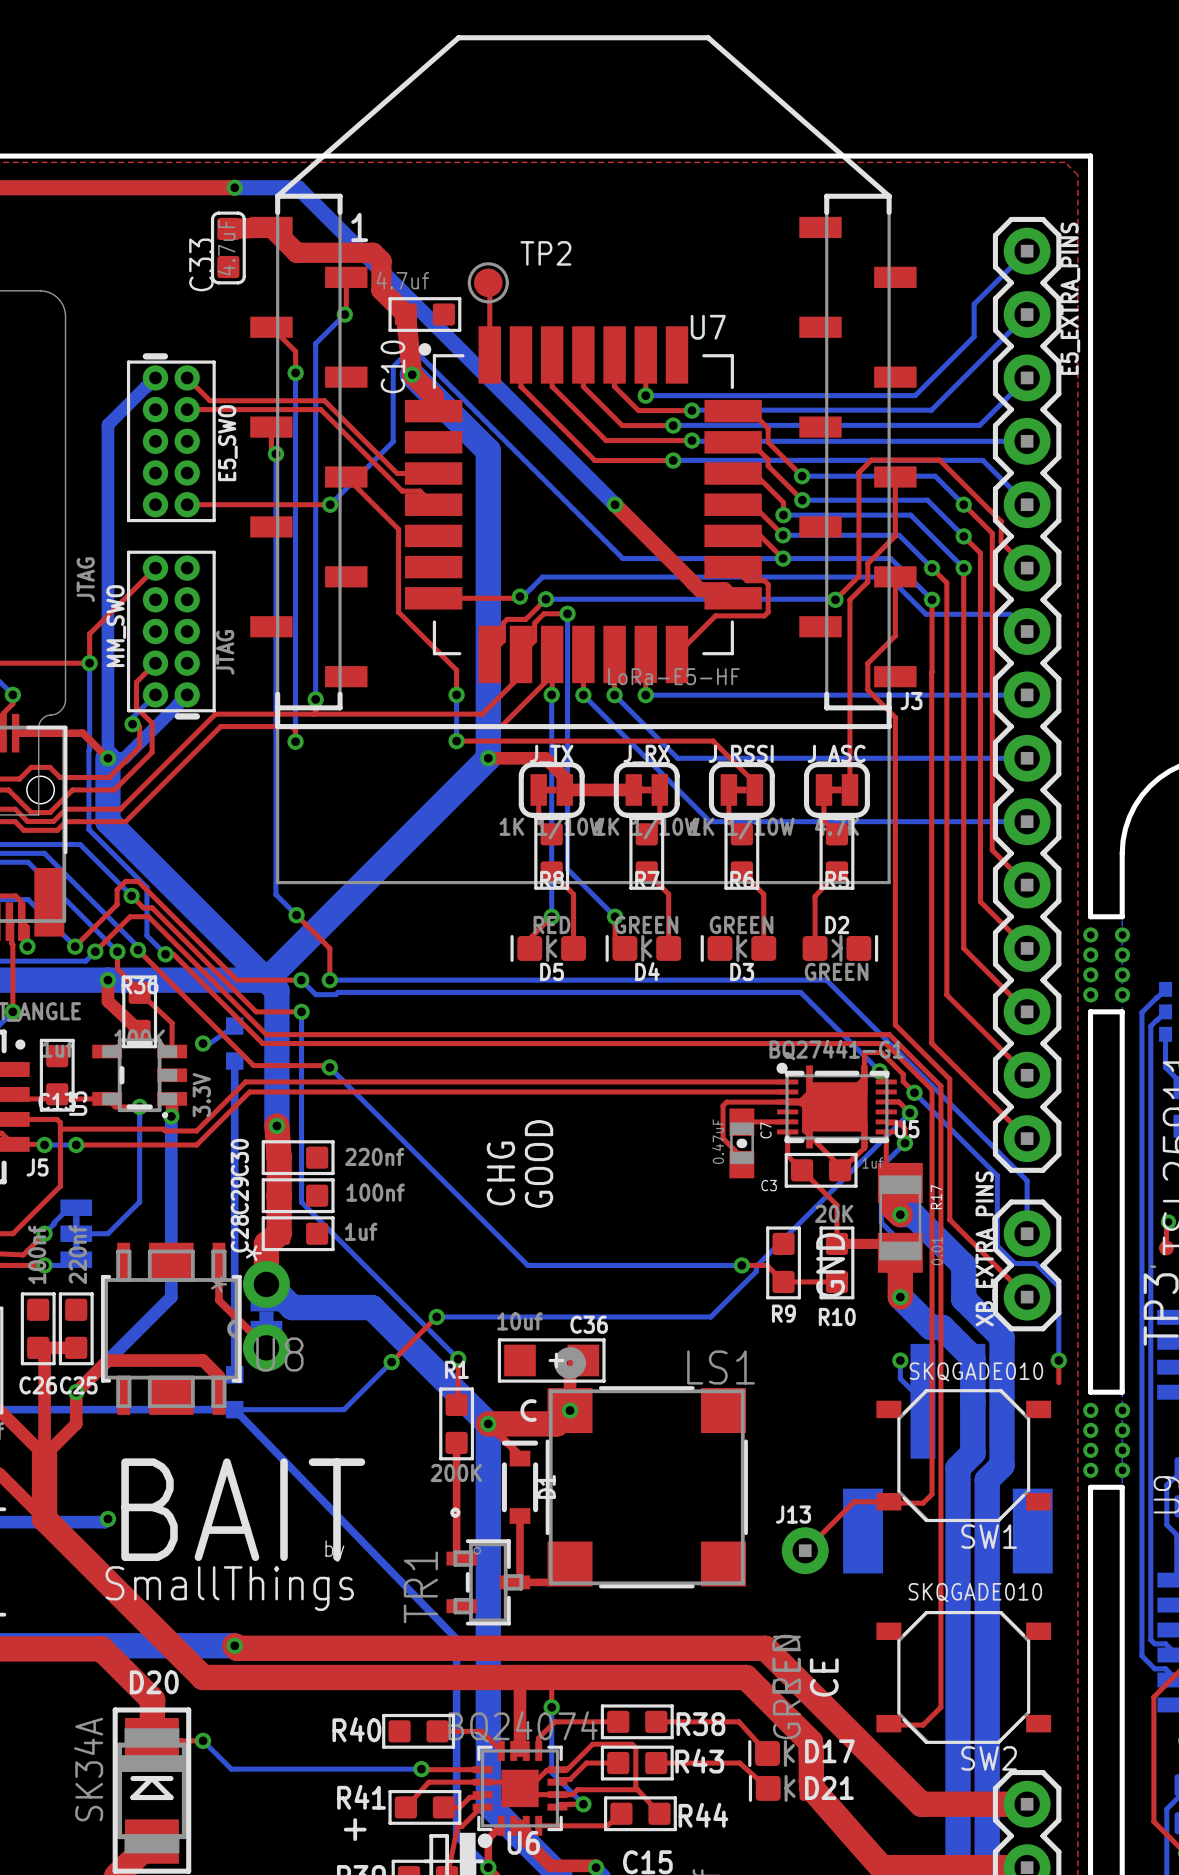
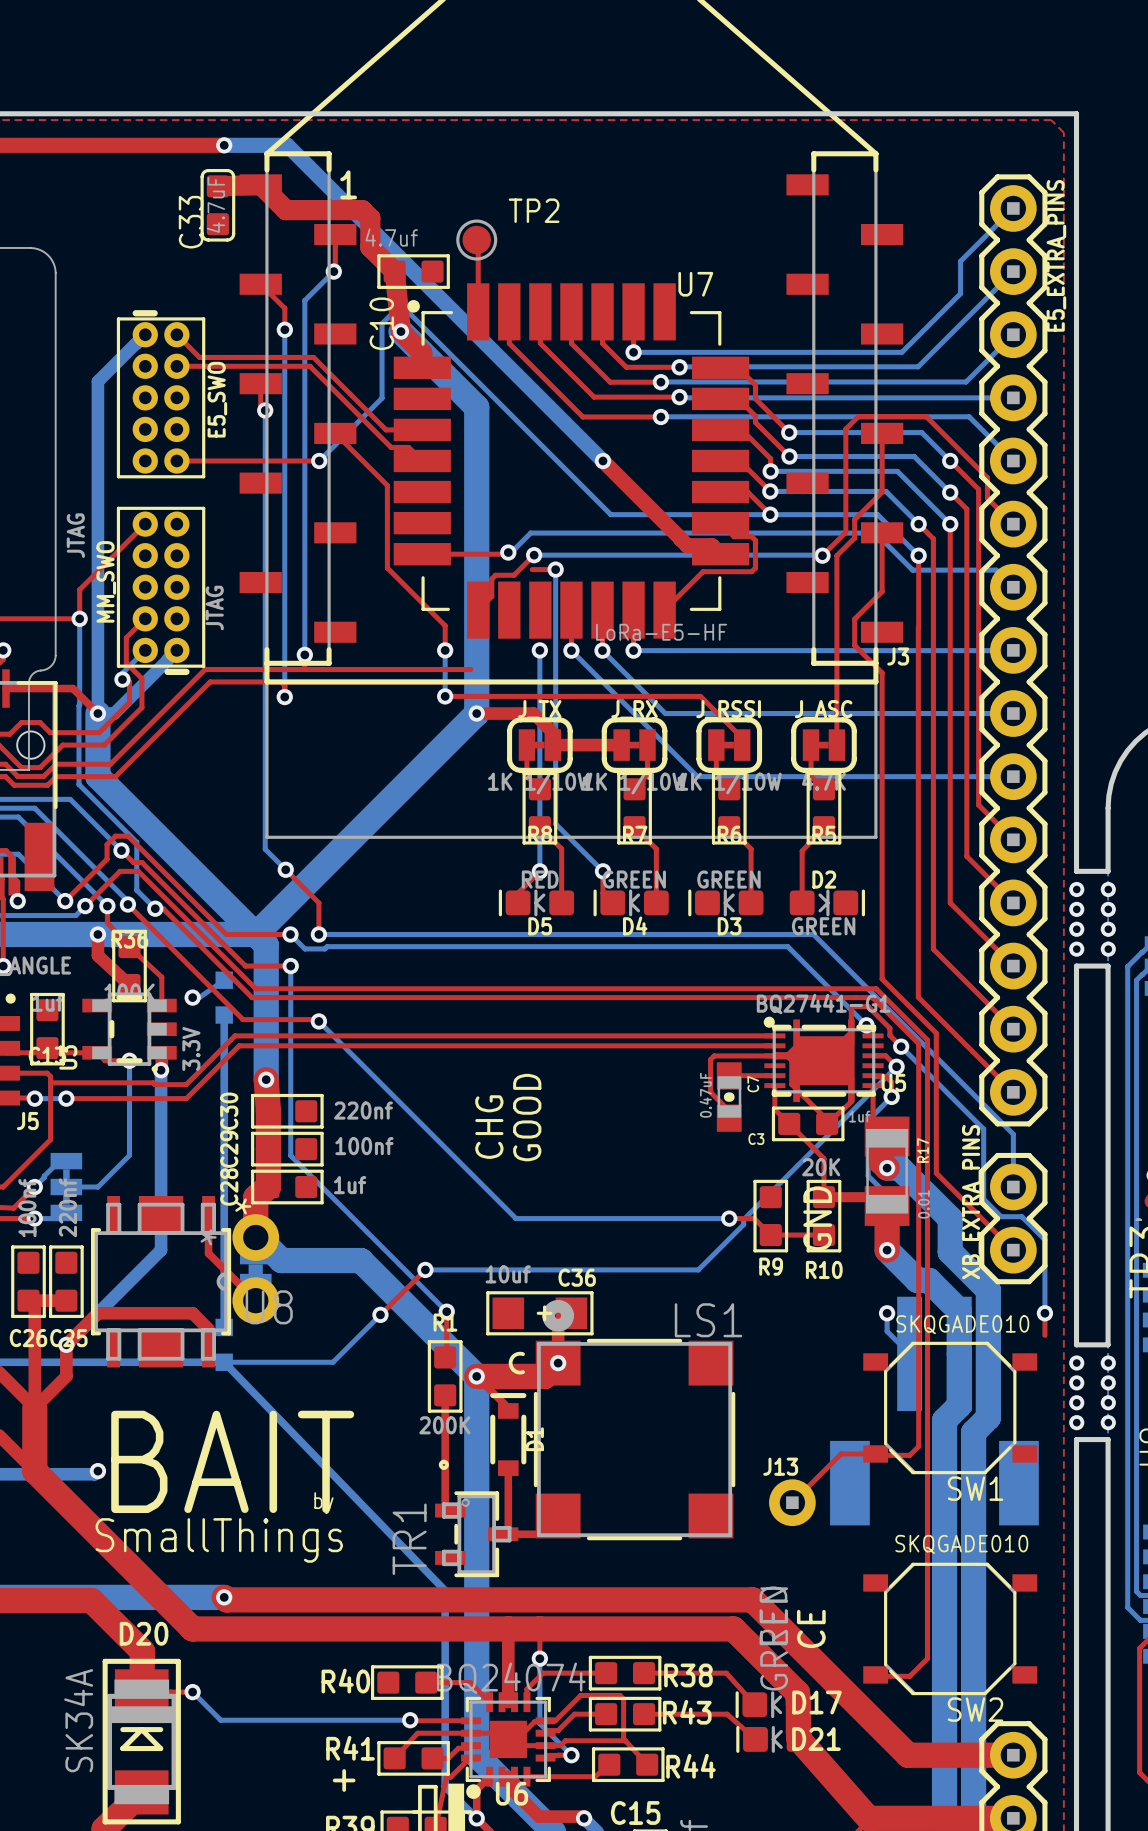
top track: (543, 613) (534, 623) (534, 640) (521, 654) -> none
top track: (521, 675) (482, 714) -> none
top track: (552, 694) (552, 675) (501, 726) -> none

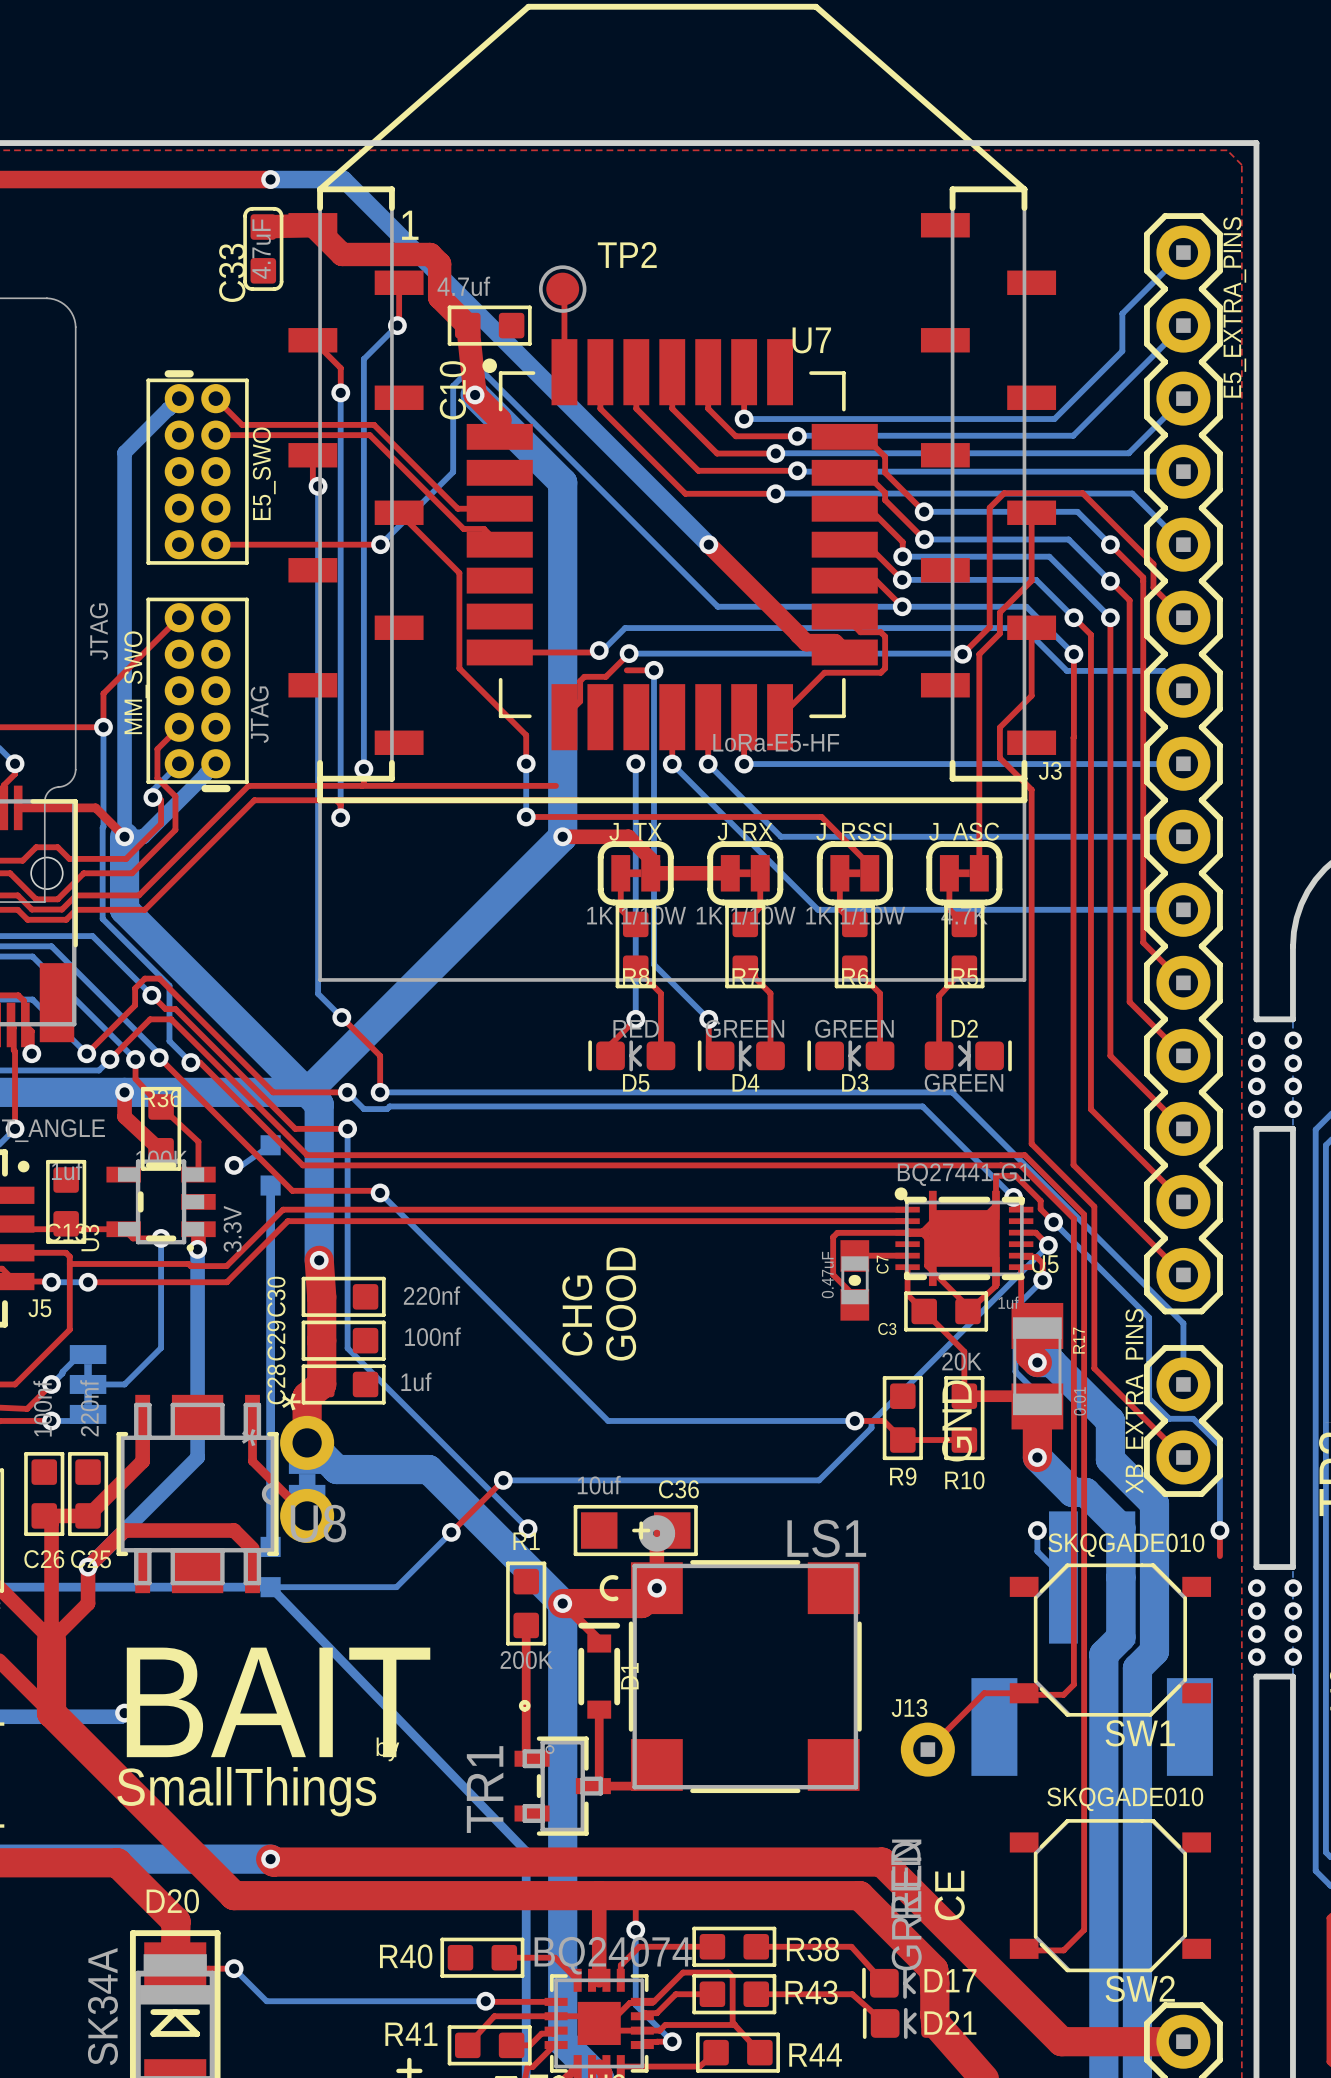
top track: none -> (142, 1416) (142, 1461) (88, 1515)
top track: (446, 1311) (445, 1357) -> none

